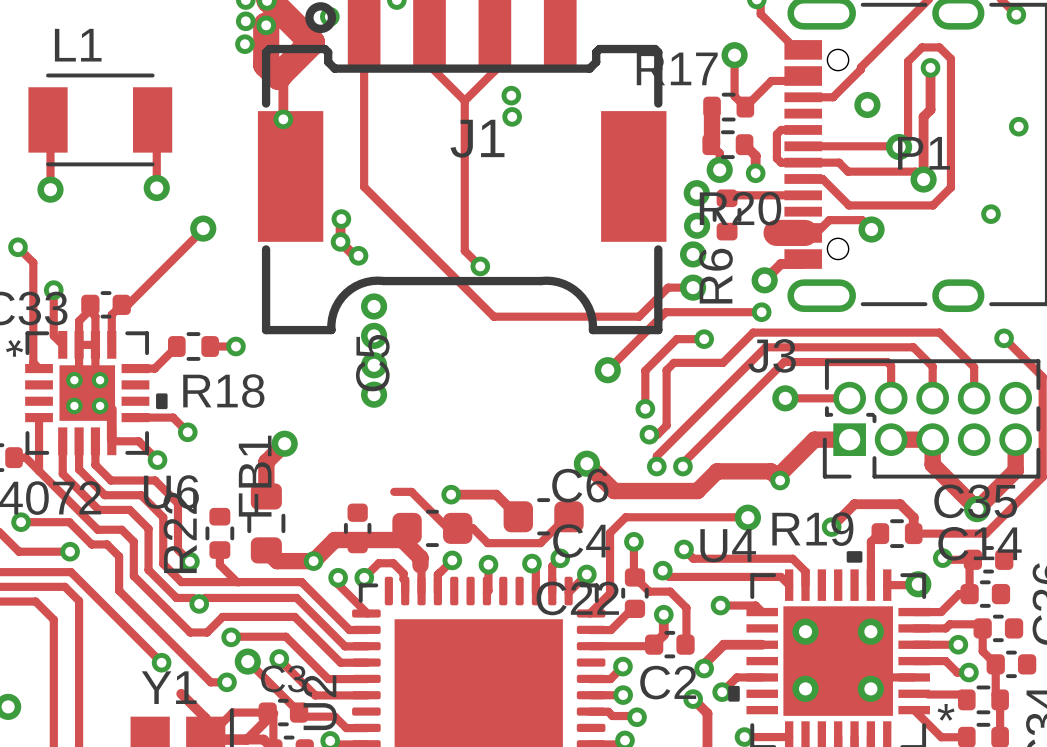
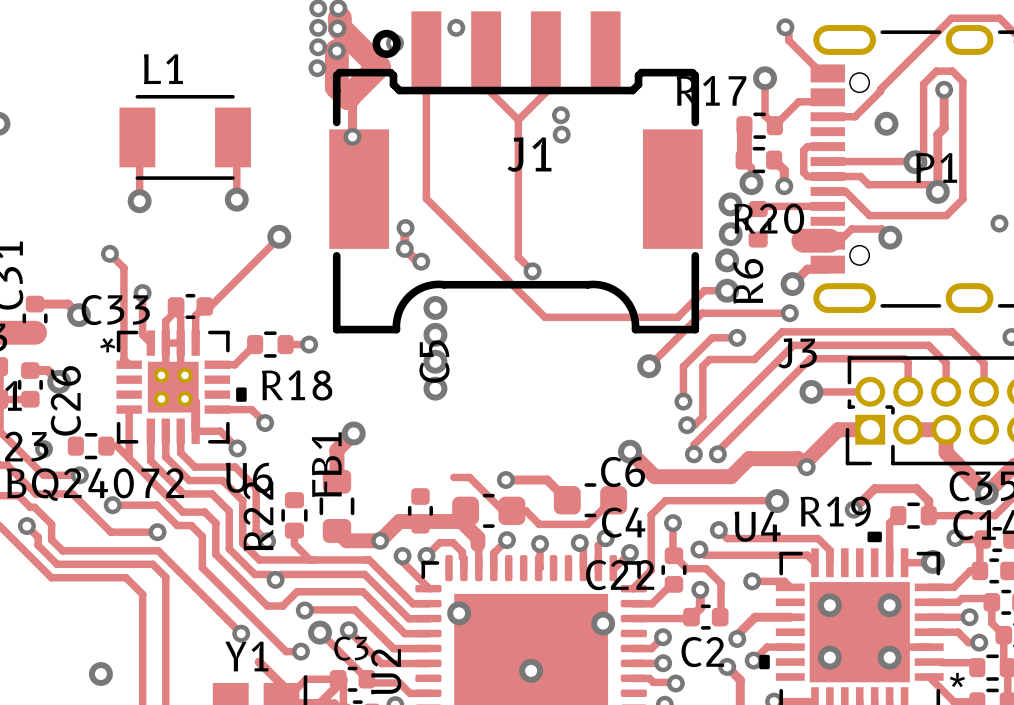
via: none -> (459, 613)
via: none -> (603, 623)
via: none -> (531, 670)

